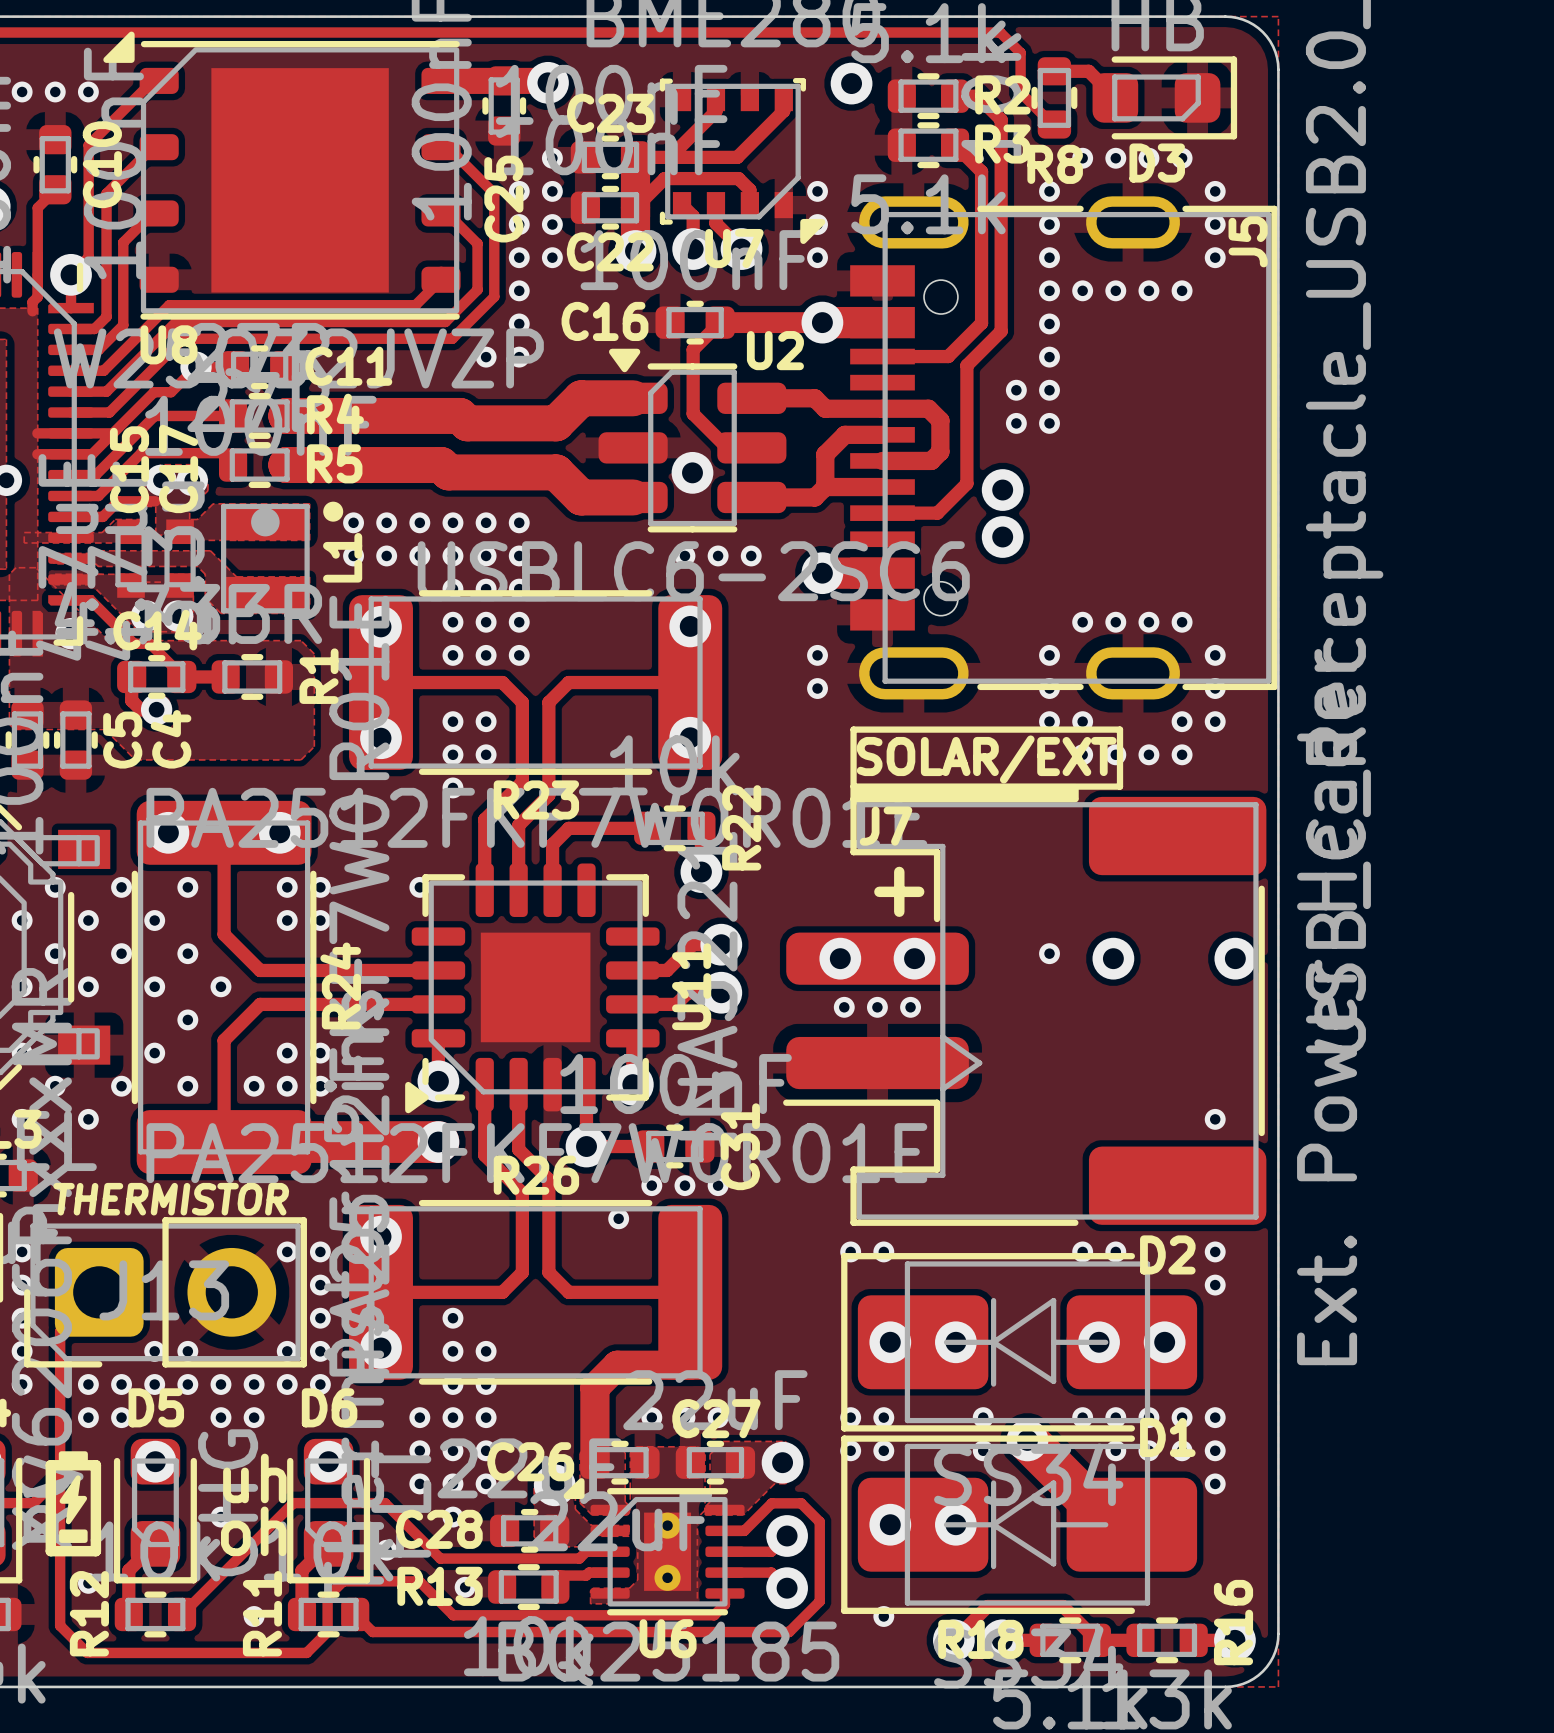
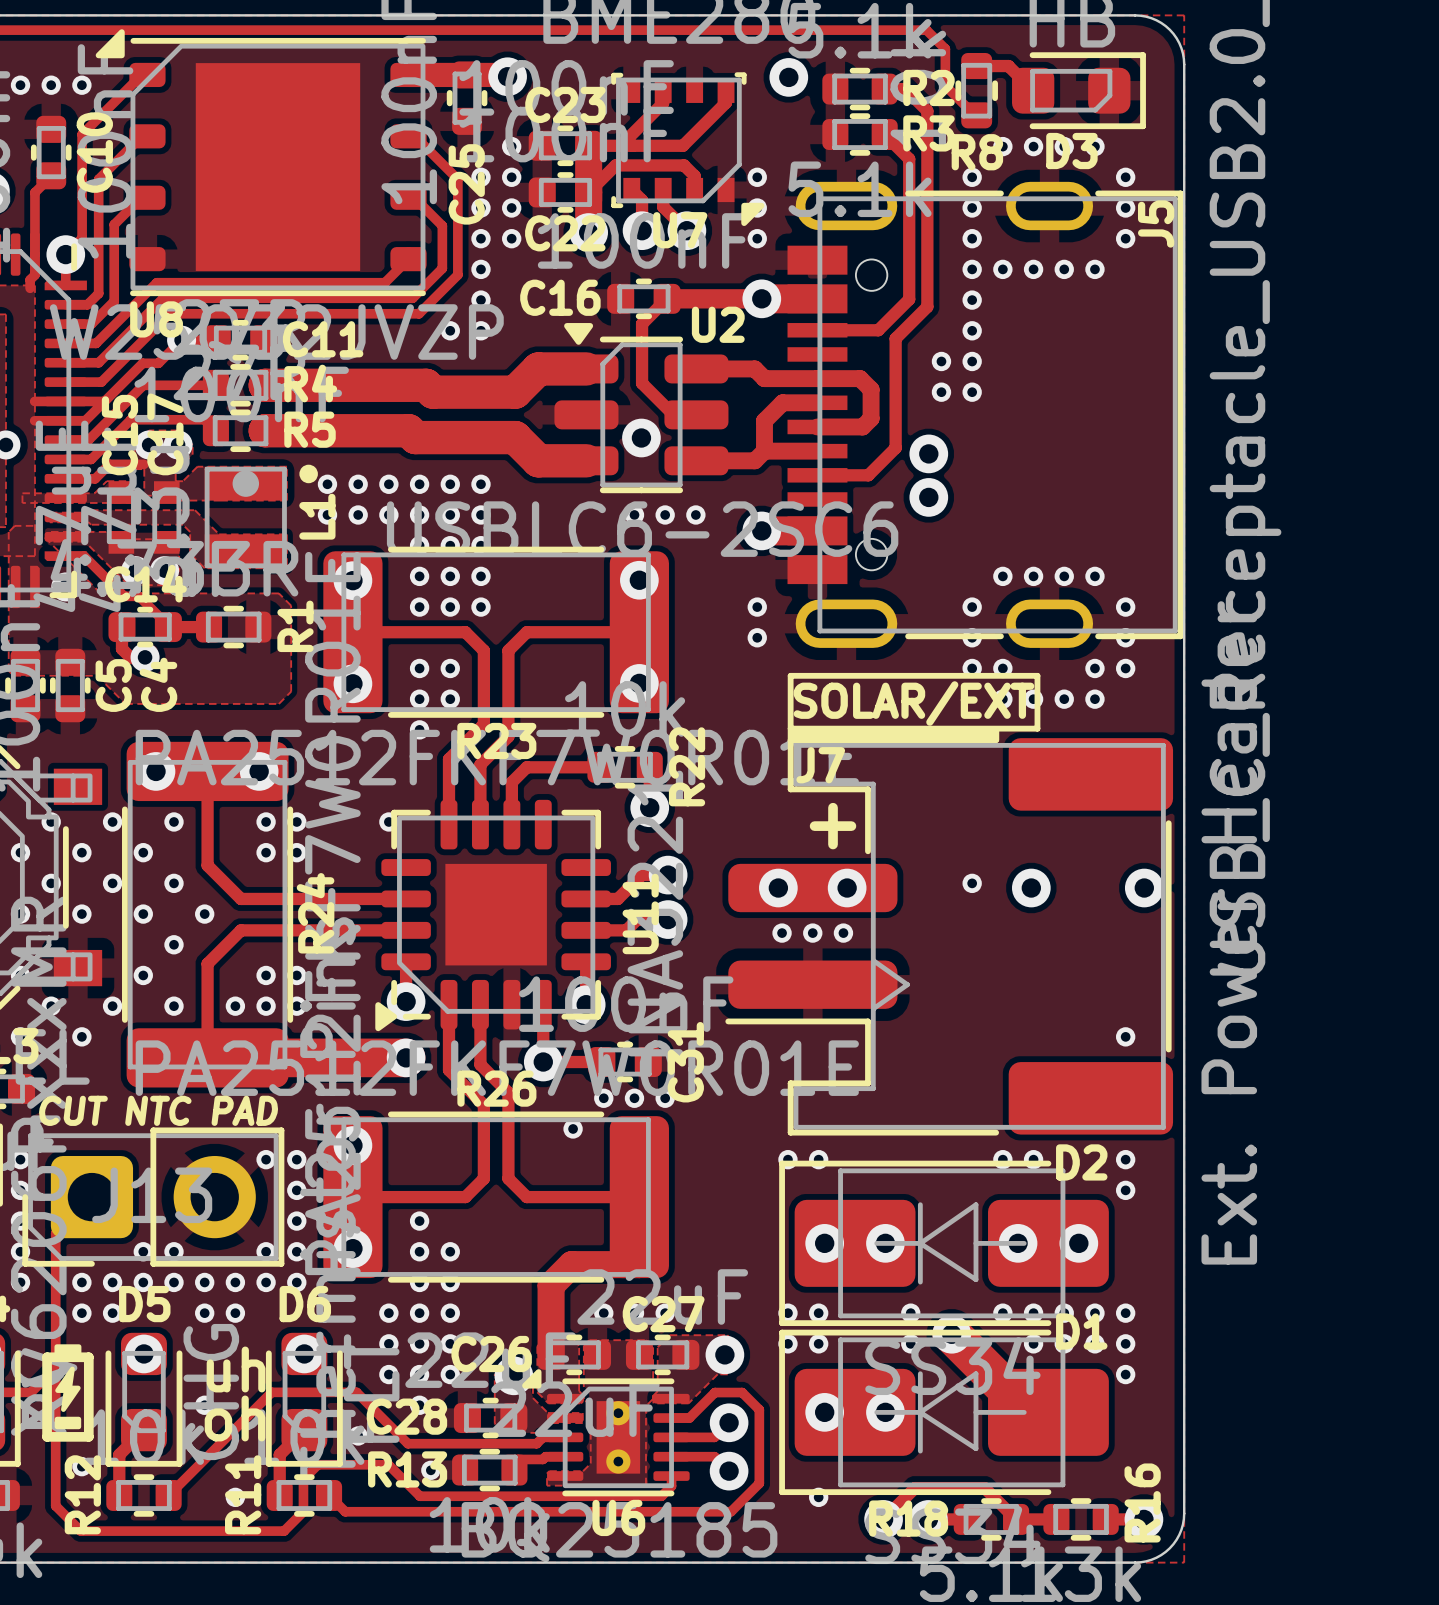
text: THERMISTOR (171, 1199) -> CUT NTC PAD (158, 1110)

